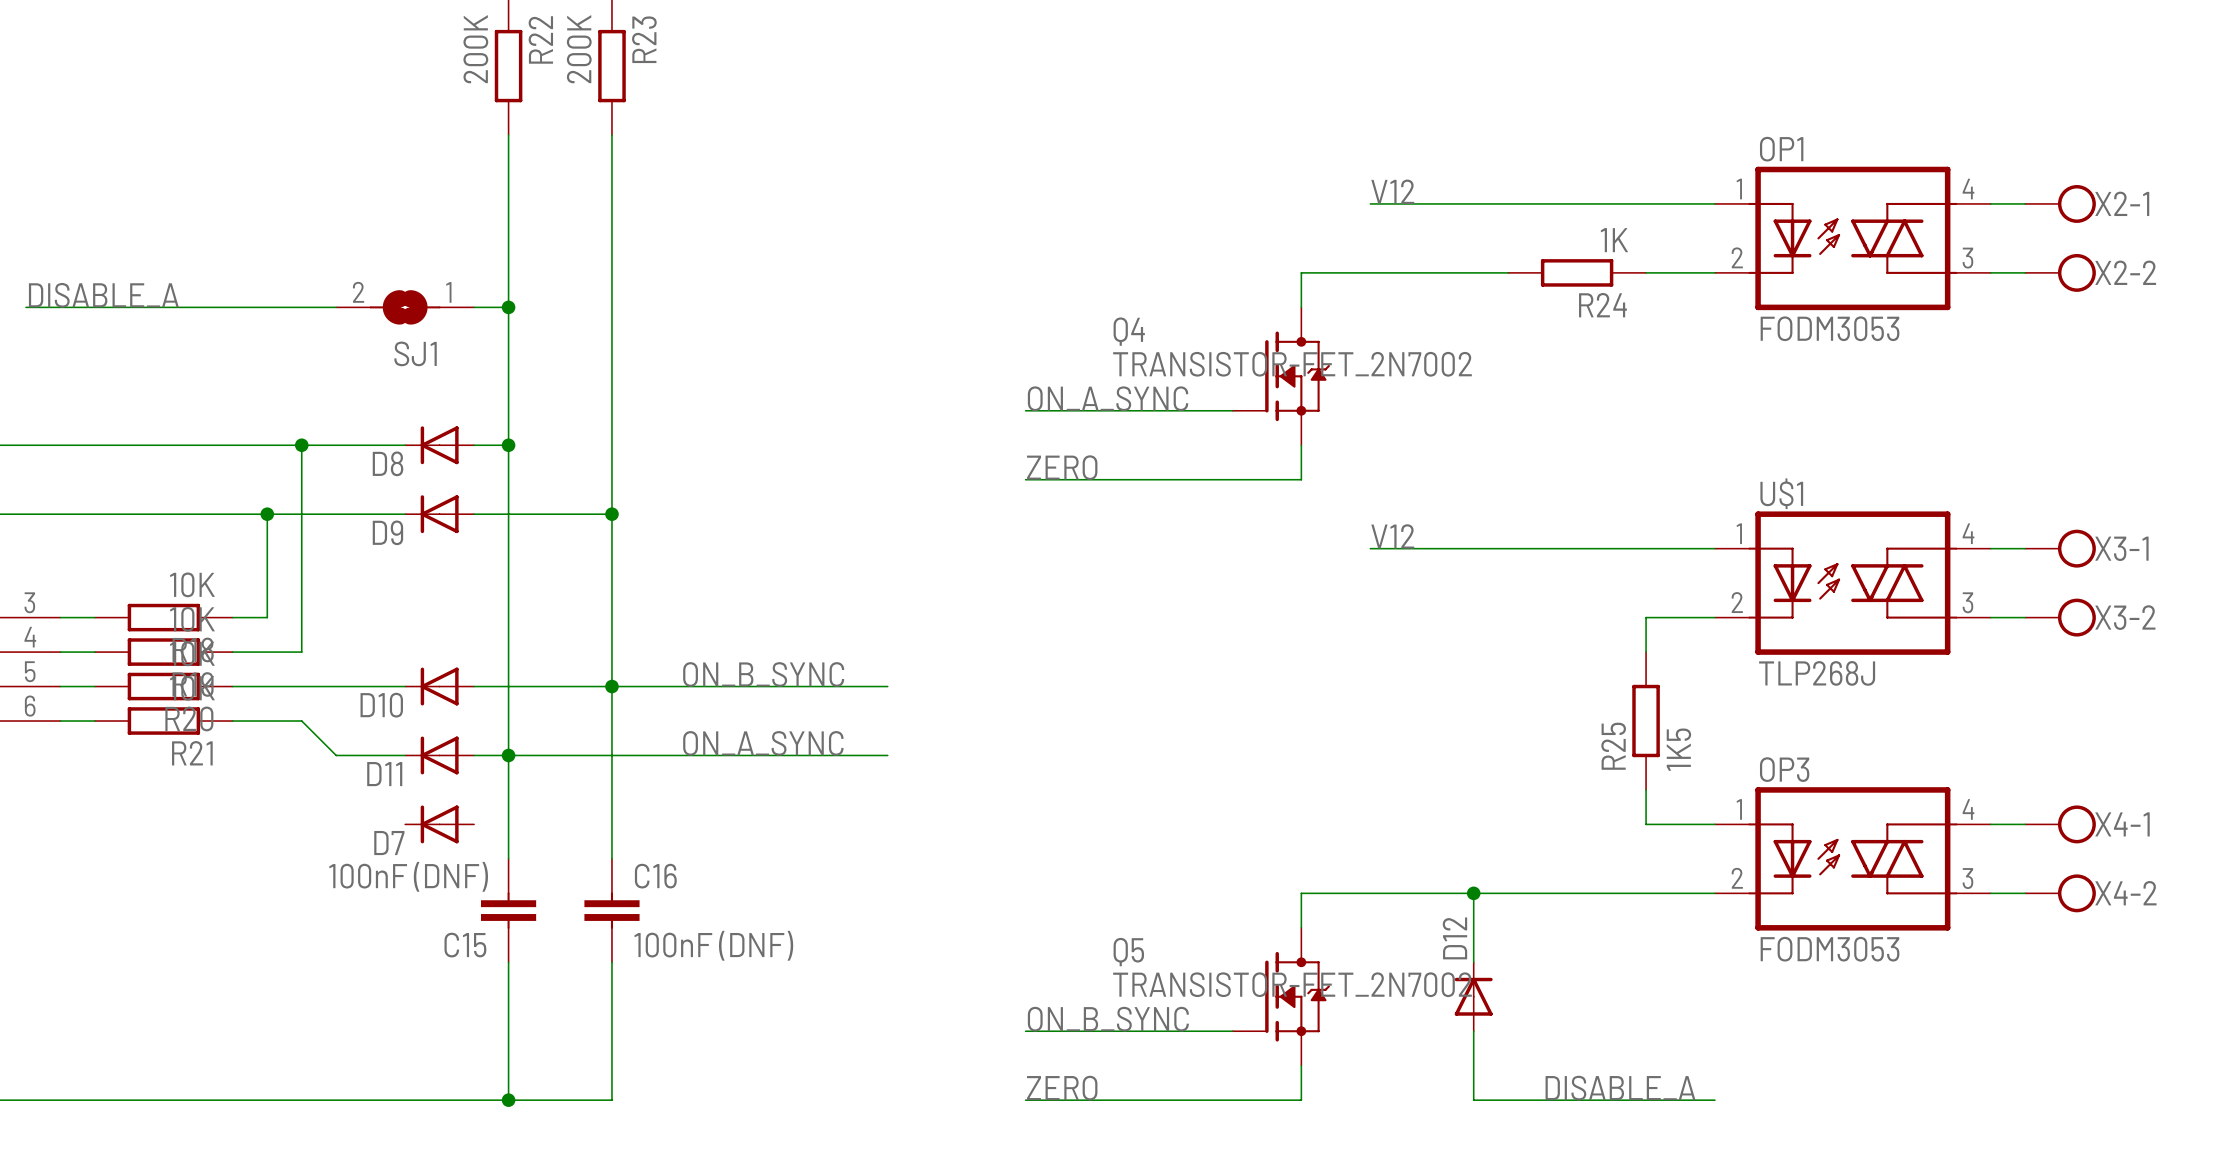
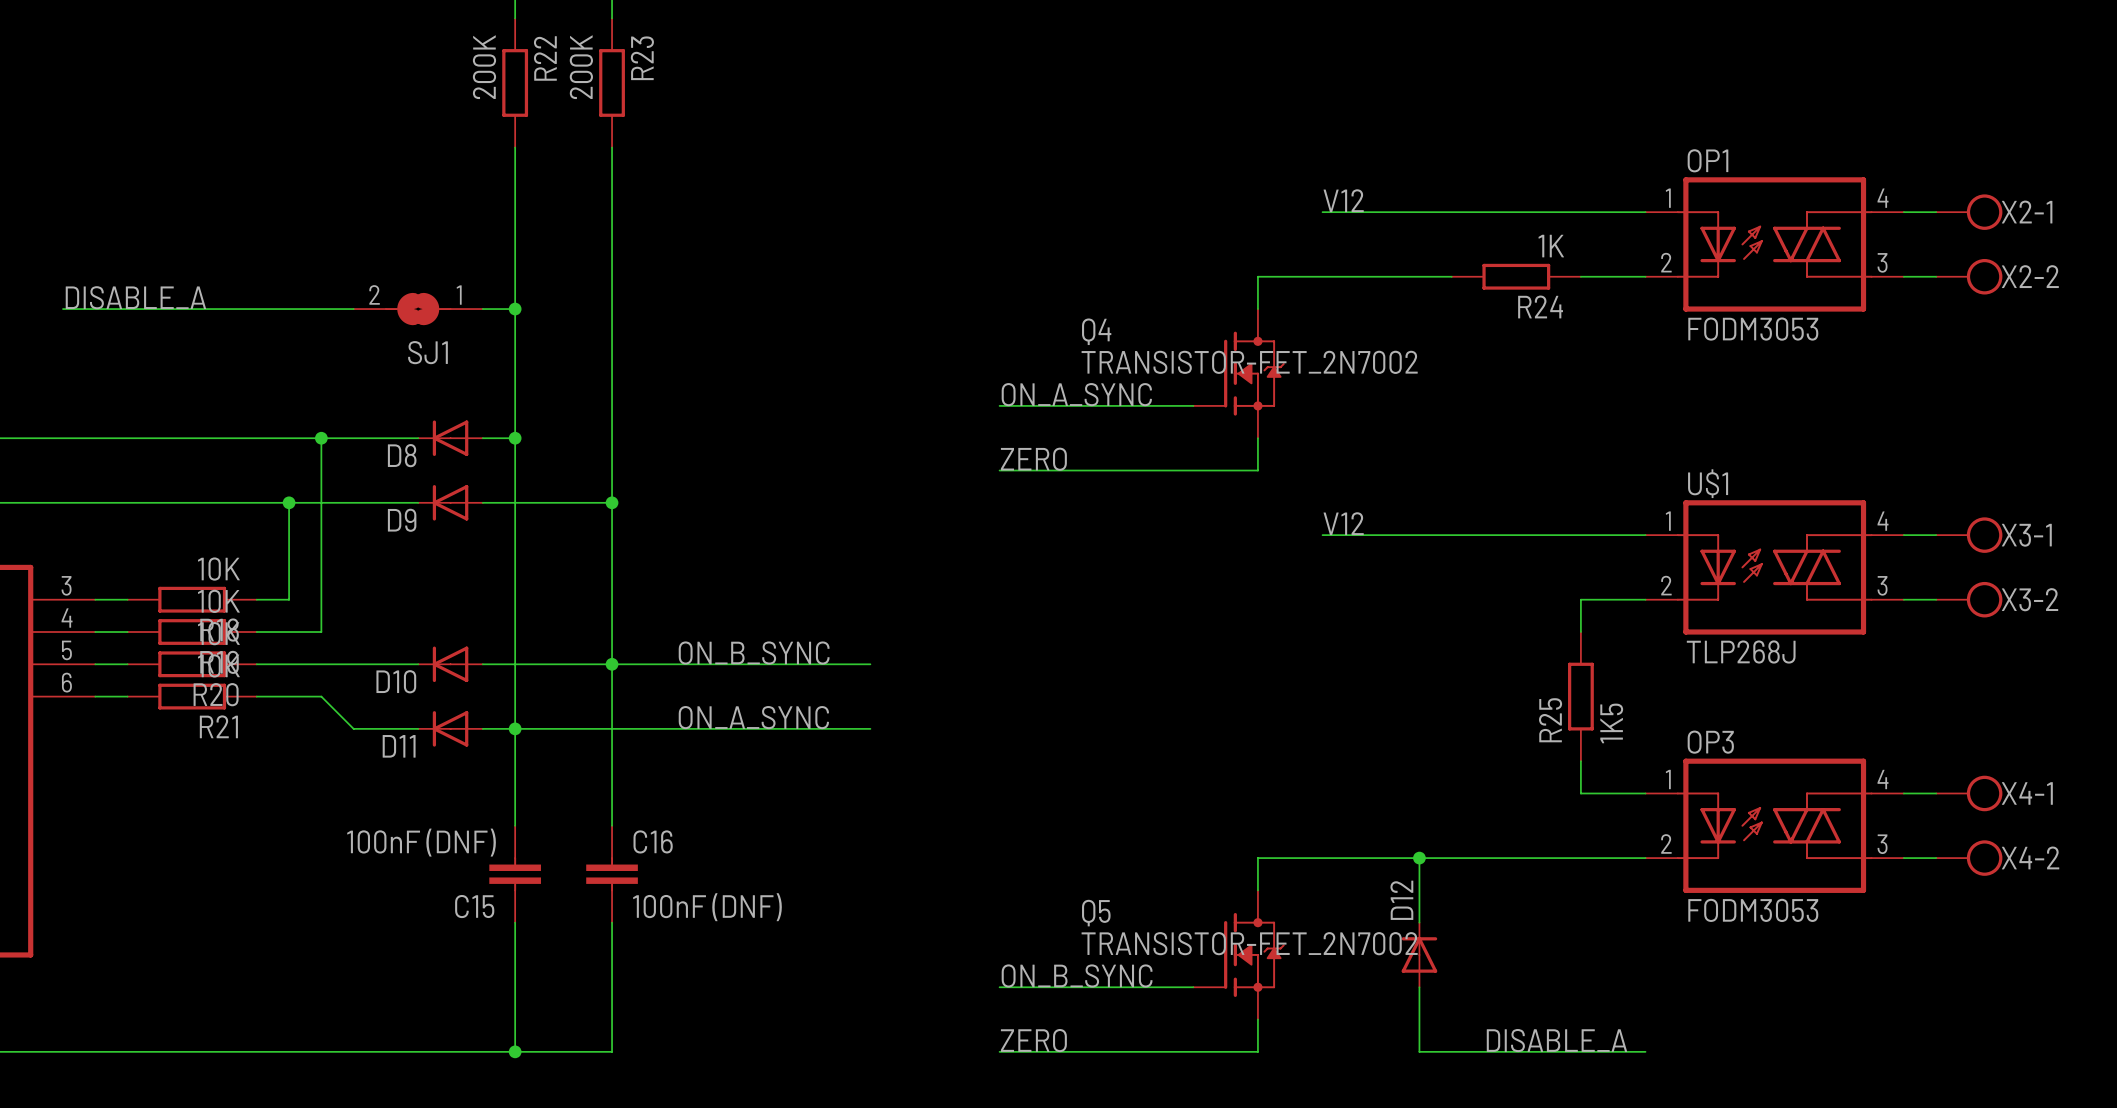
D7: (439, 824) -> none

